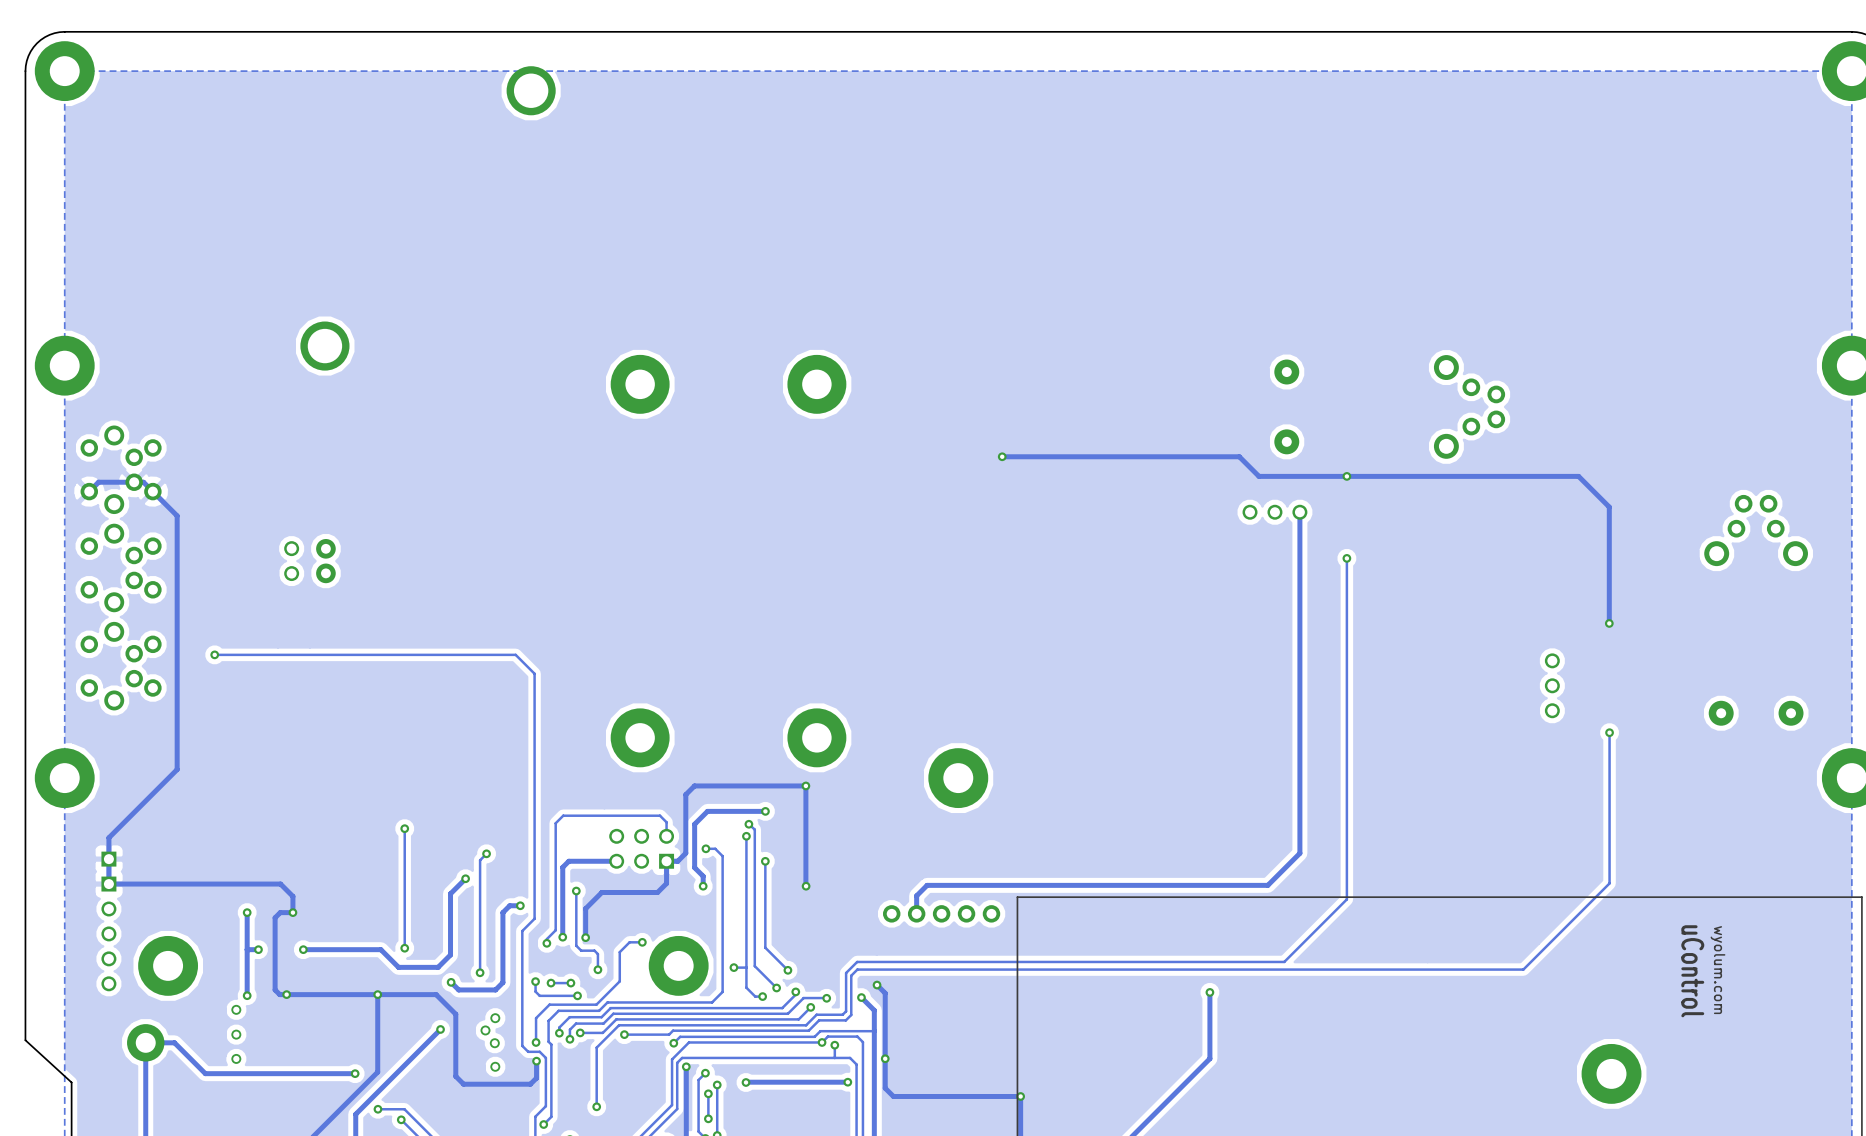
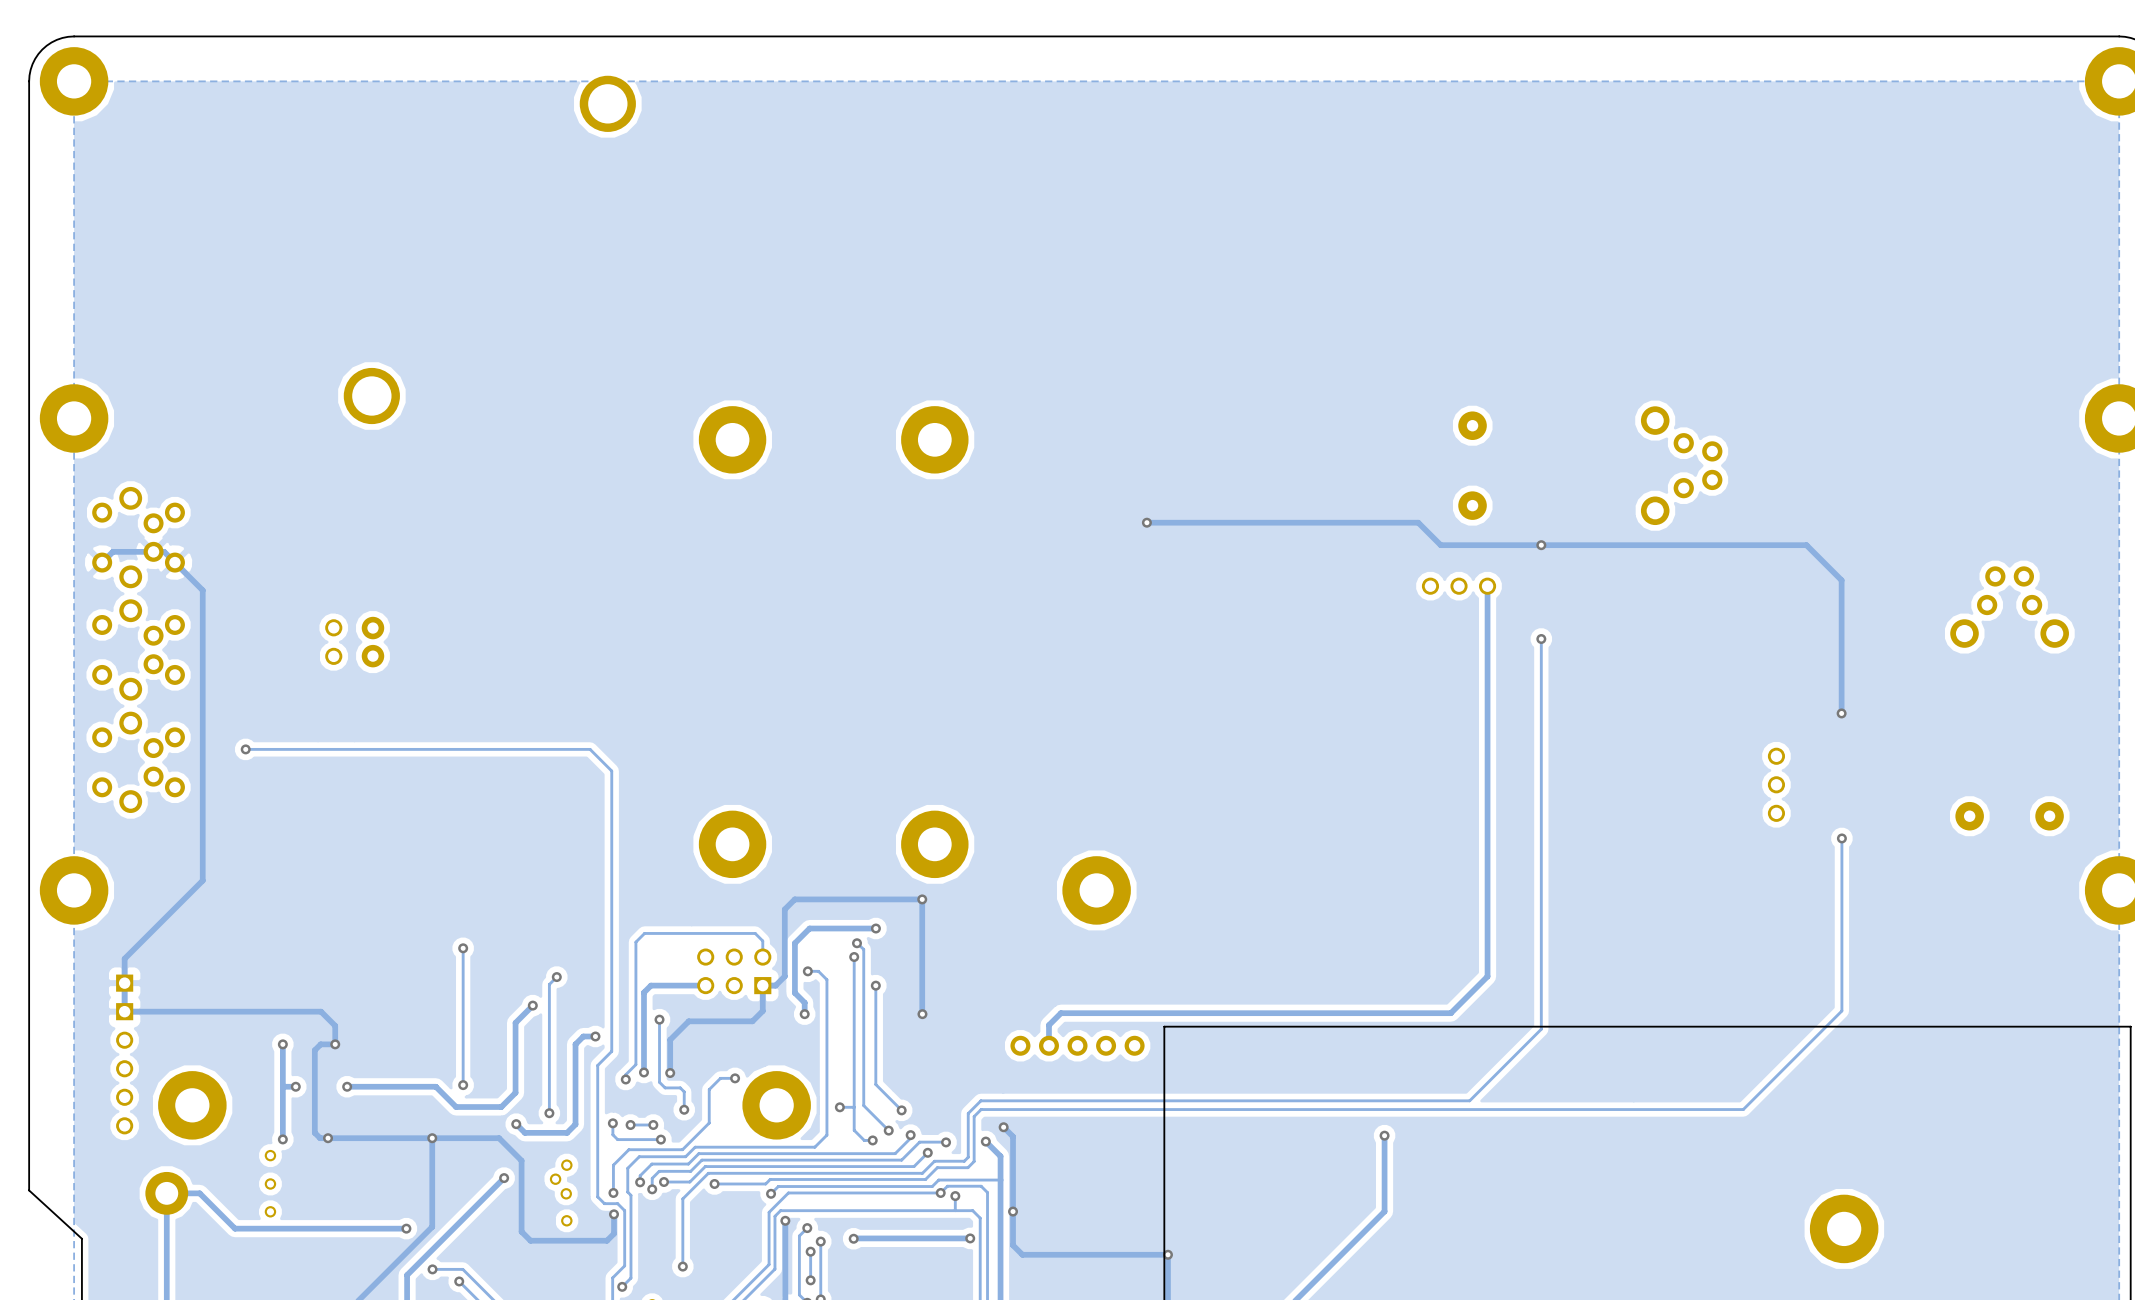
text: wyolum.com (1717, 970) -> none
text: uControl (1692, 971) -> none

